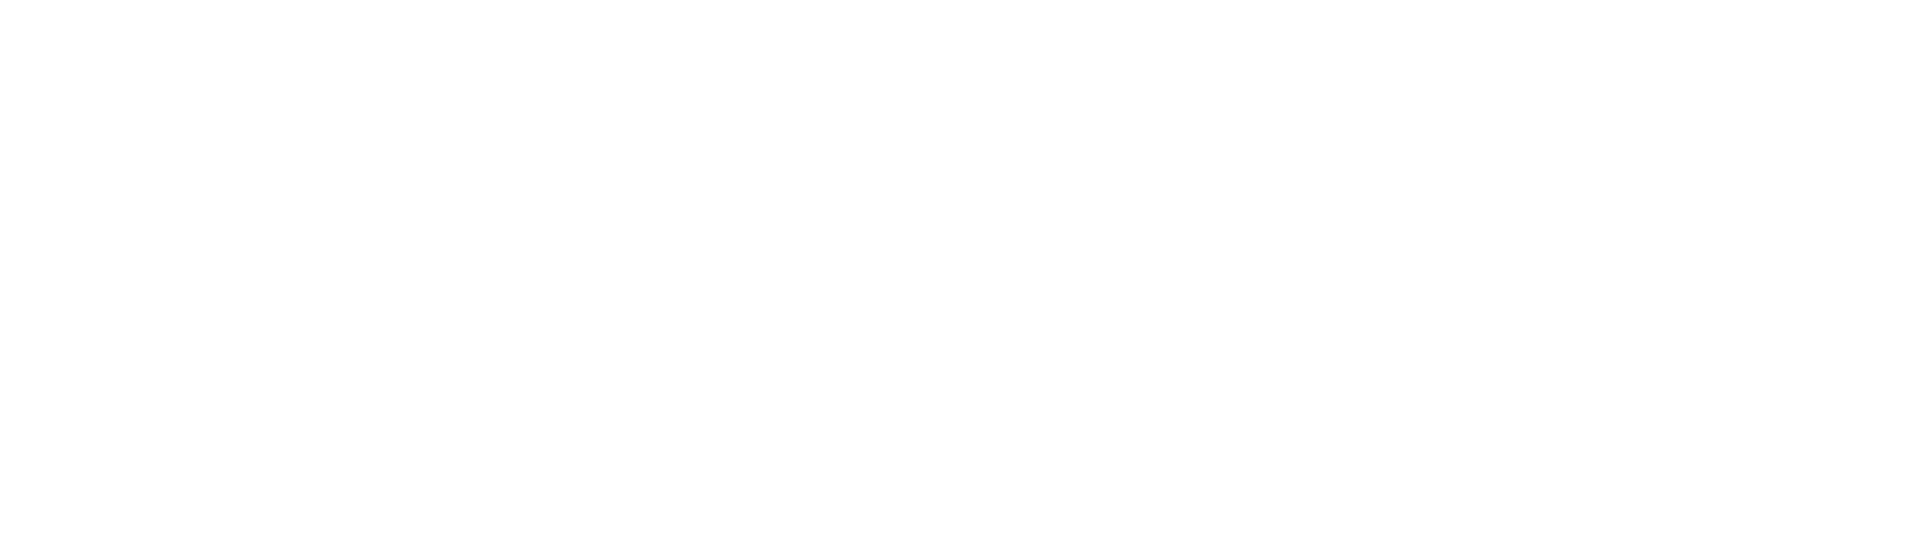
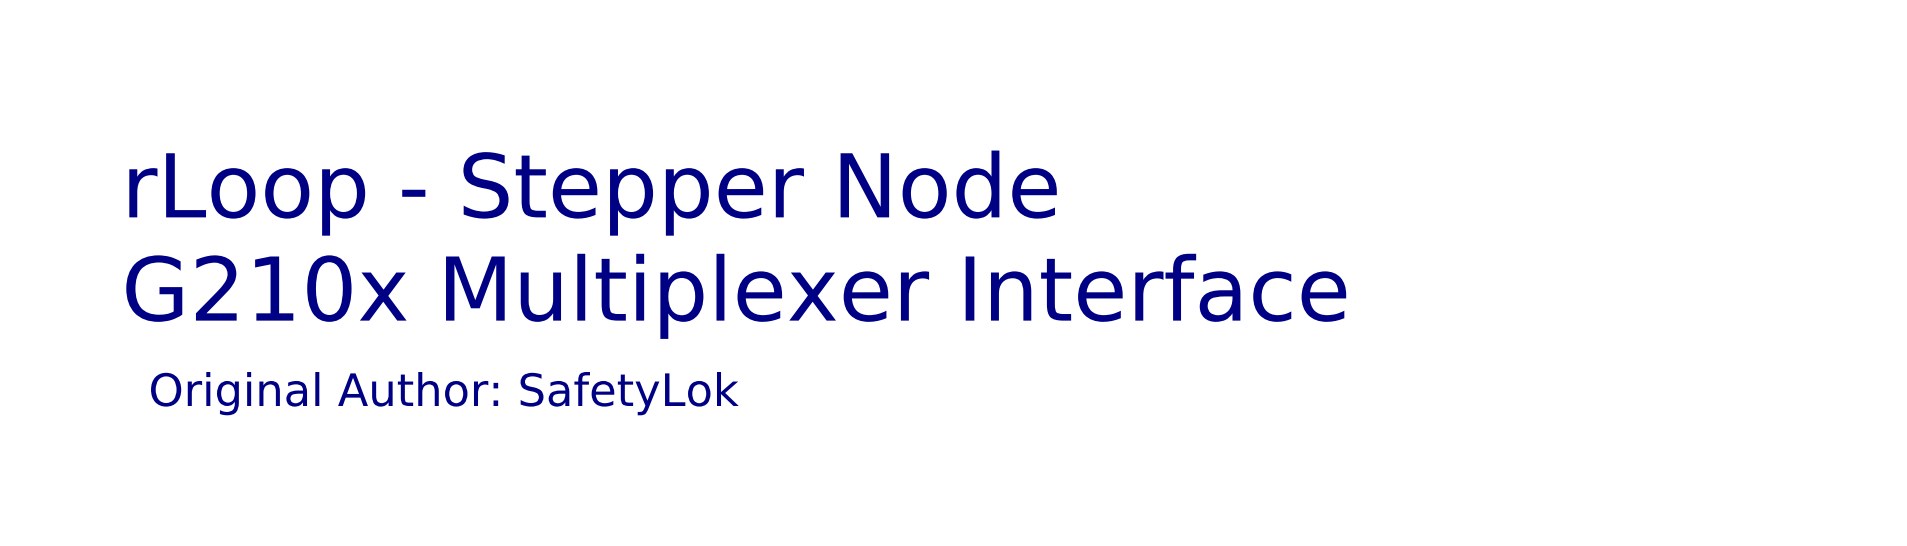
text: none -> rLoop - Stepper Node (593, 193)
text: none -> G210x Multiplexer Interface (736, 296)
text: none -> Original Author: SafetyLok (444, 393)

